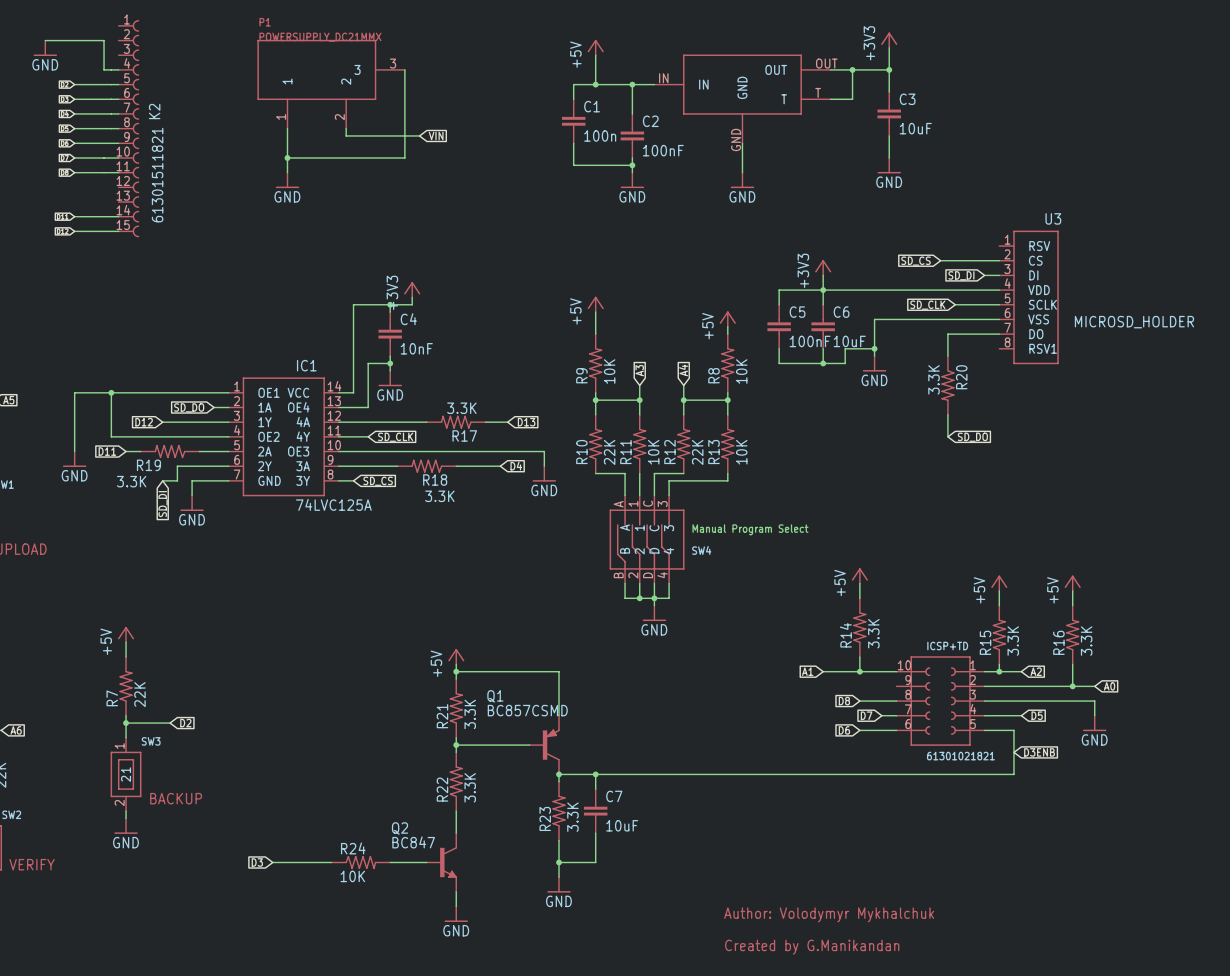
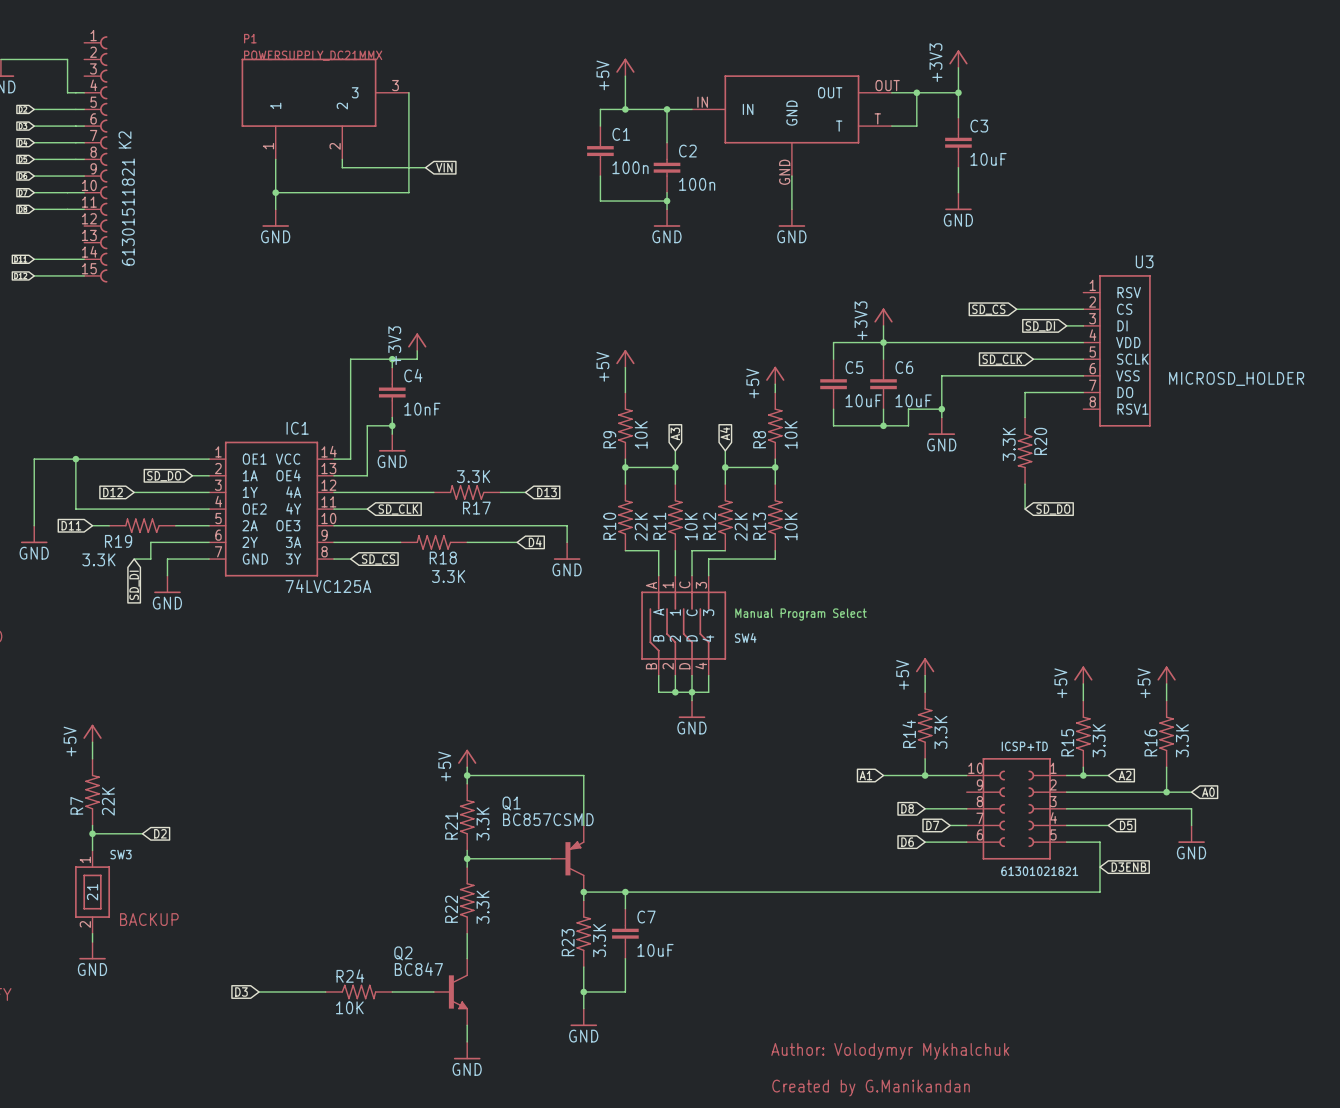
C2 value: 100nF (663, 150) -> 100n (697, 184)
C5 value: 100nF (810, 341) -> 10uF (863, 400)

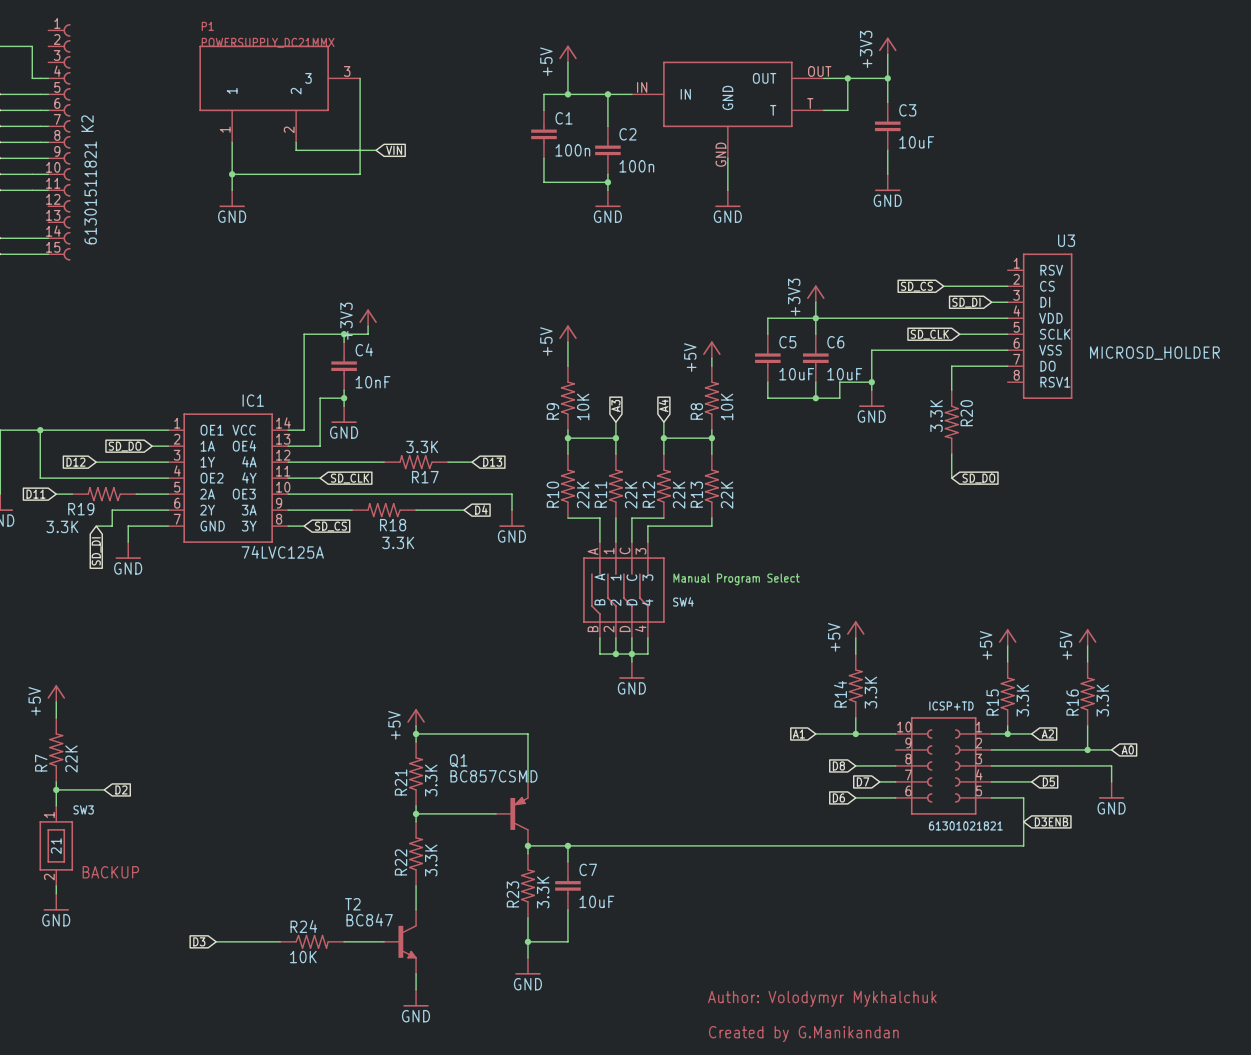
R11 value: 10K (691, 526) -> 22K (631, 495)
R13 value: 10K (791, 526) -> 22K (727, 495)
Q2 name: Q2 (403, 953) -> T2 (352, 904)

